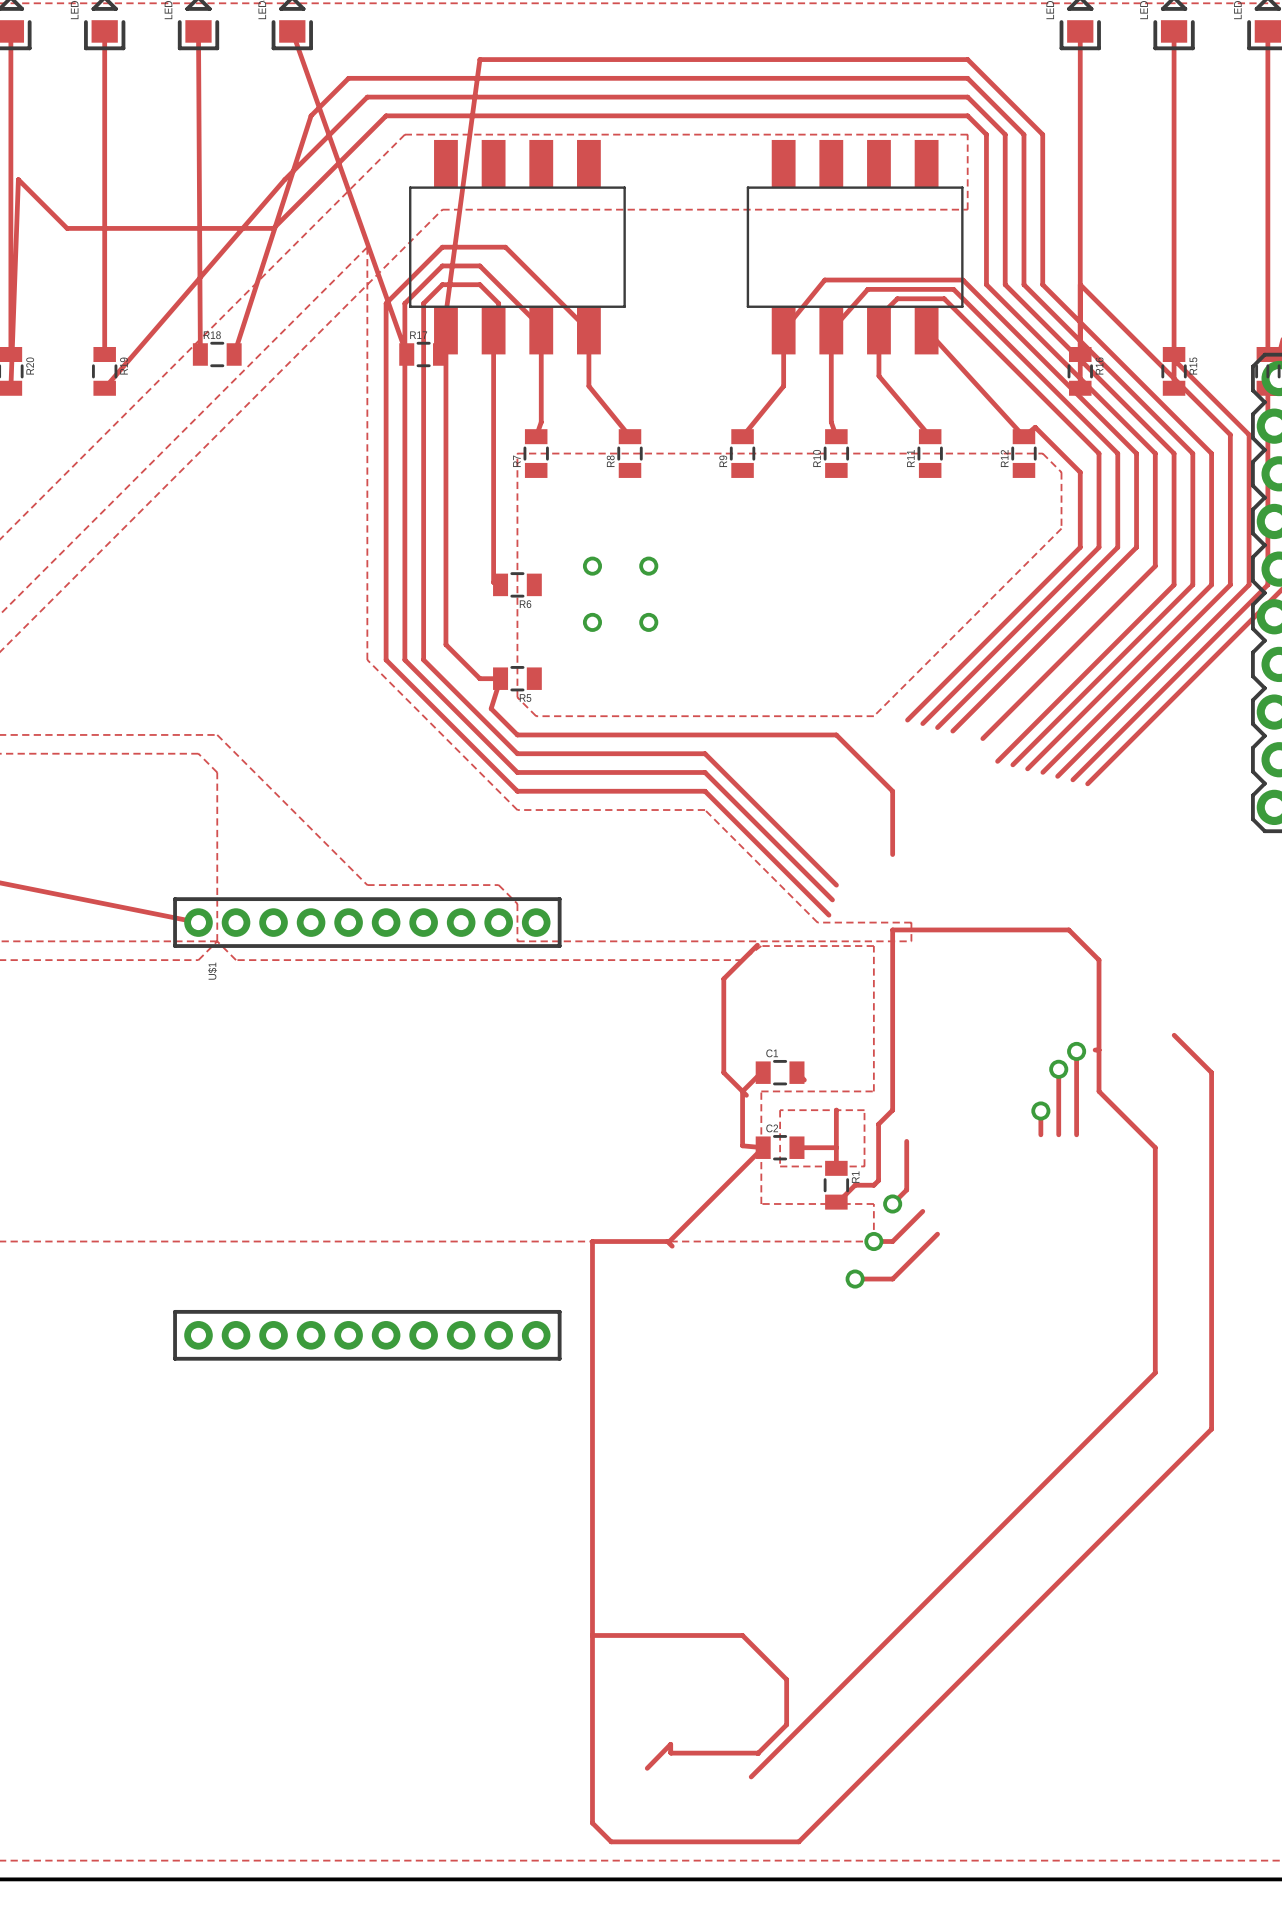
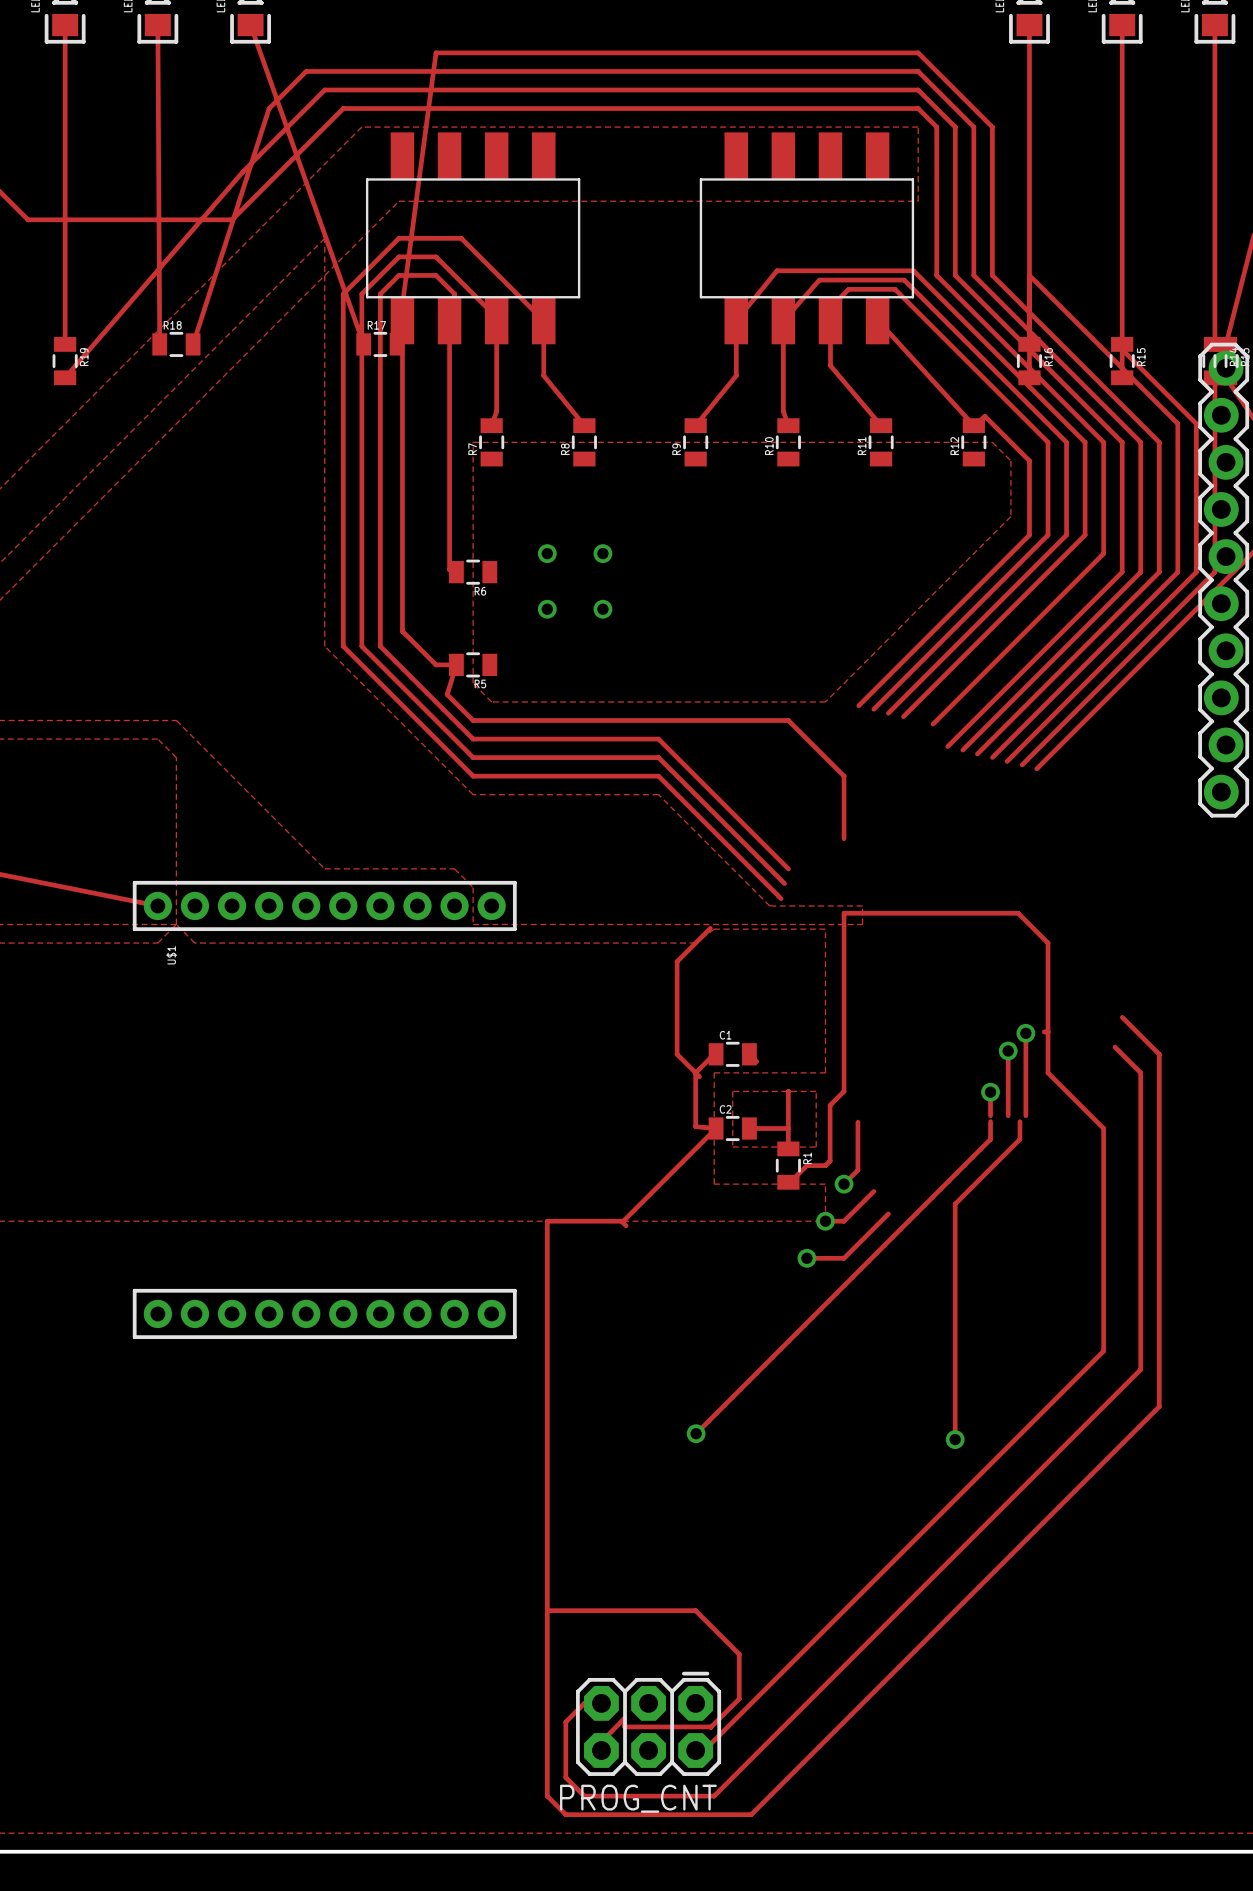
track: none -> (1114, 1047) (1140, 1072) (1140, 1369) (714, 1796) (584, 1796) (565, 1777) (565, 1721) (584, 1703) (601, 1703)
track: none -> (990, 1121) (990, 1139) (696, 1433)
track: none -> (1019, 1121) (1019, 1139) (955, 1204) (955, 1439)
via: none -> (696, 1433)
via: none -> (955, 1439)
PROG_CNT: none -> (648, 1723)

